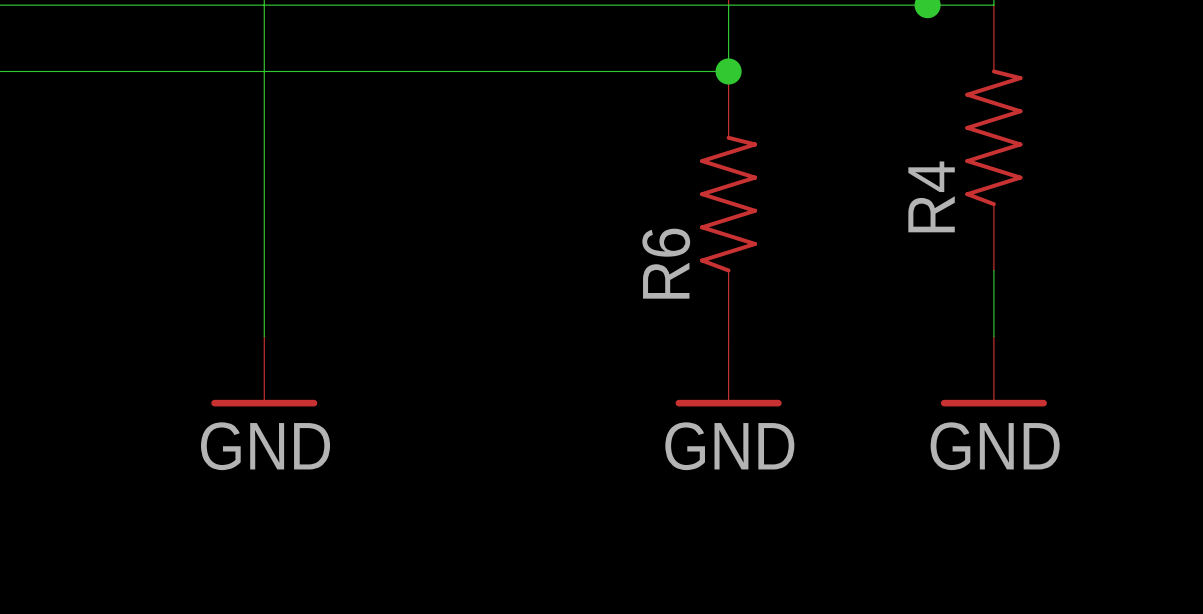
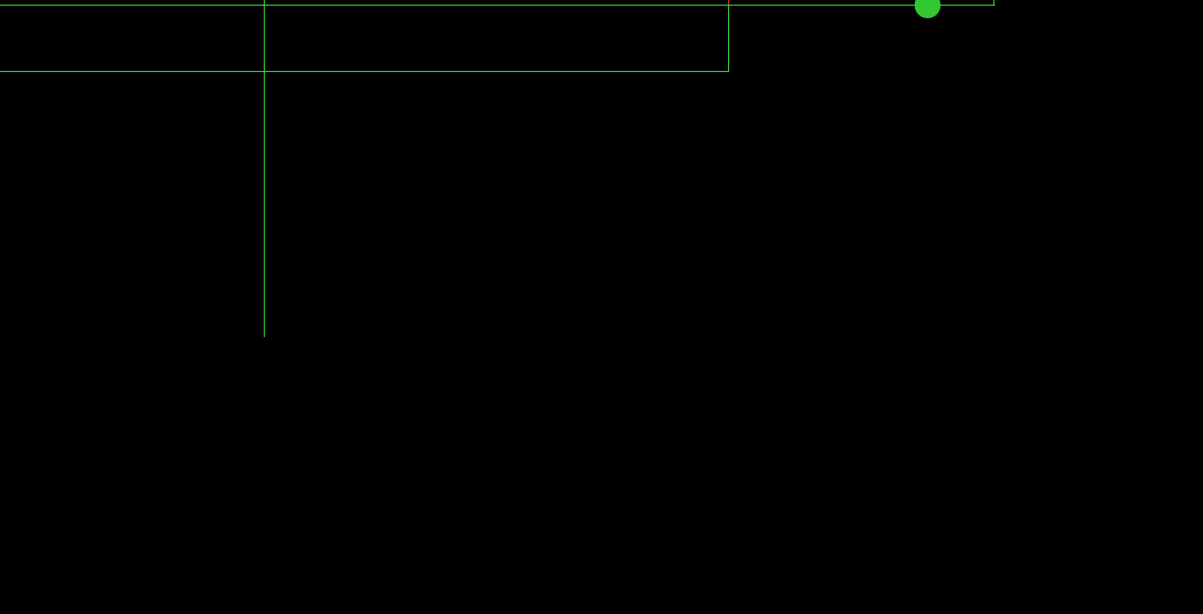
junction: (728, 71) -> none
R4: (993, 137) -> none
R6: (728, 204) -> none
wire: (993, 270) (993, 336) -> none
power symbol: GND (264, 371) -> none
power symbol: GND (728, 371) -> none
power symbol: GND (993, 371) -> none

